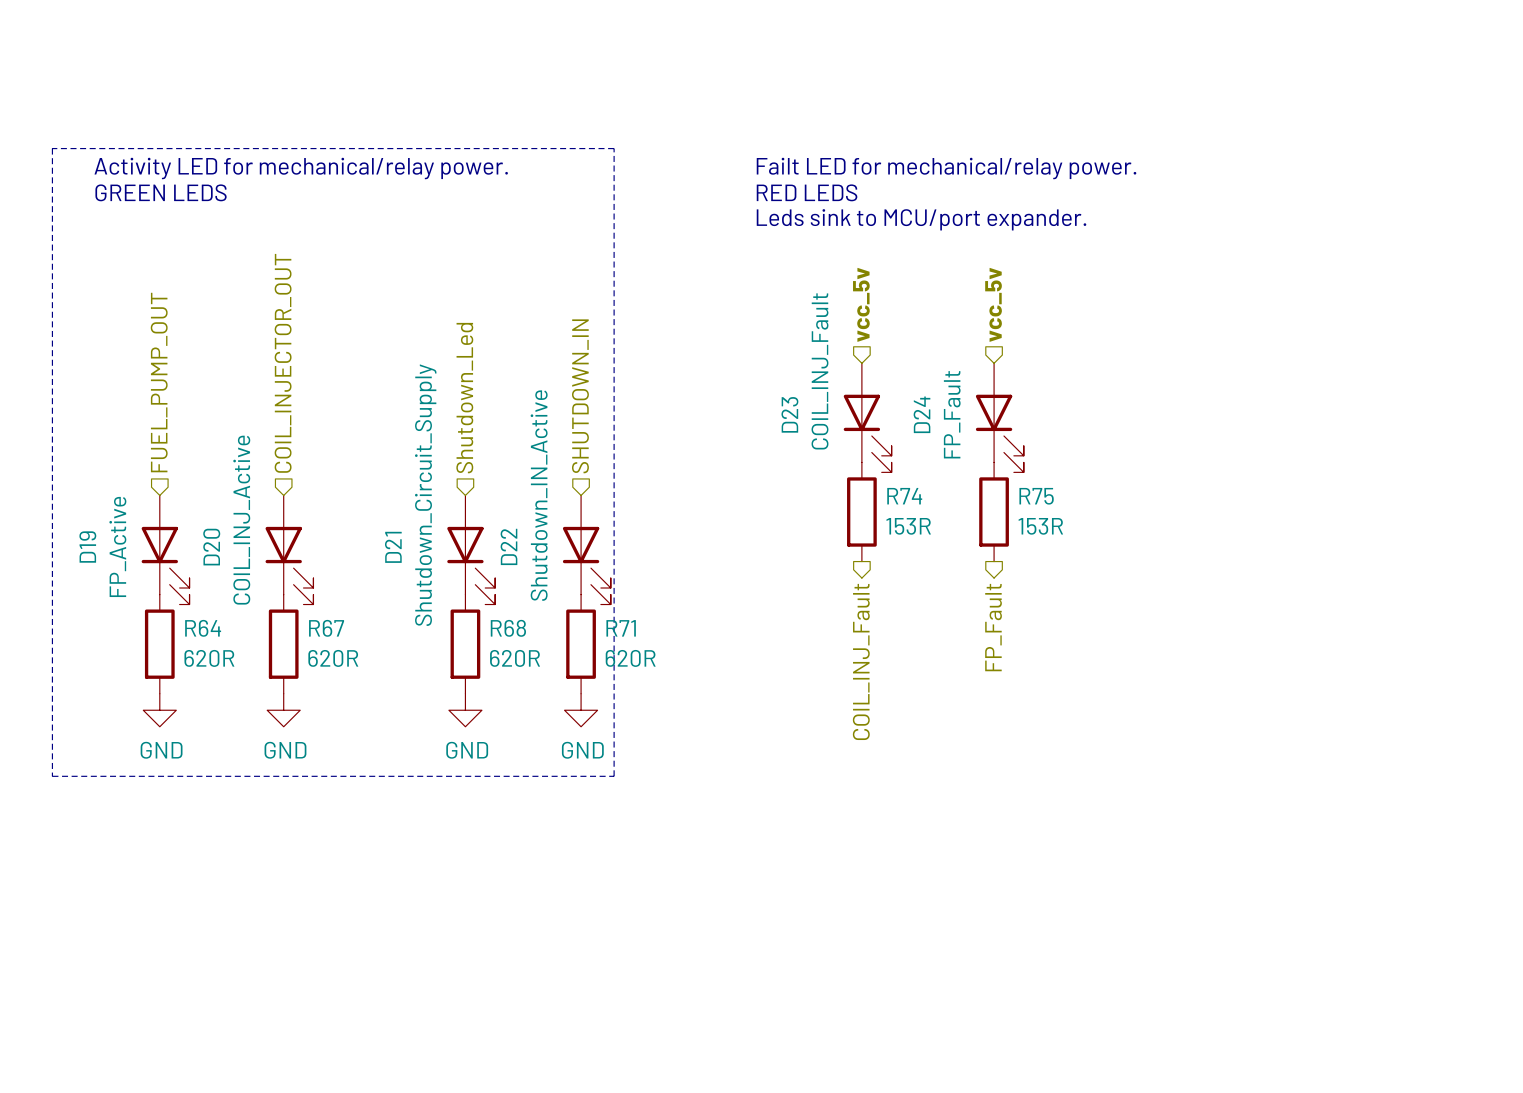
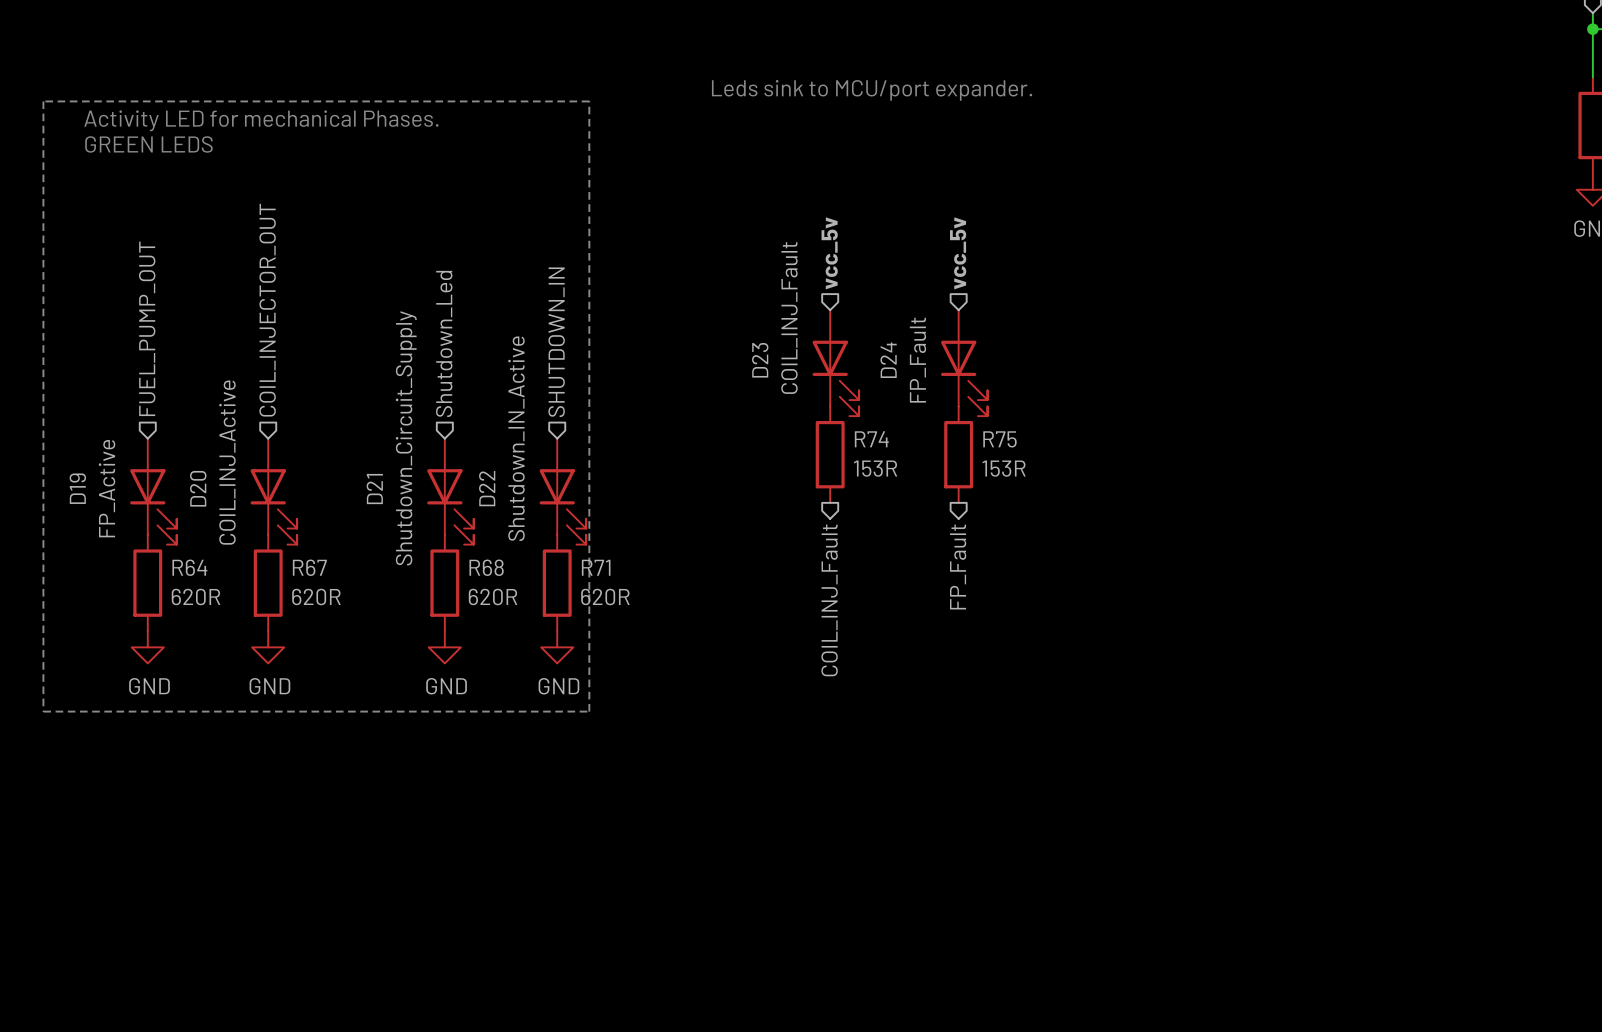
text: Activity LED for mechanical/relay power. (301, 168) -> Activity LED for mechanical Phases. (261, 120)
text: Failt LED for mechanical/relay power. (946, 168) -> none
text: RED LEDS (807, 192) -> none
text position: Leds sink to MCU/port expander. (921, 219) -> Leds sink to MCU/port expander. (872, 90)

